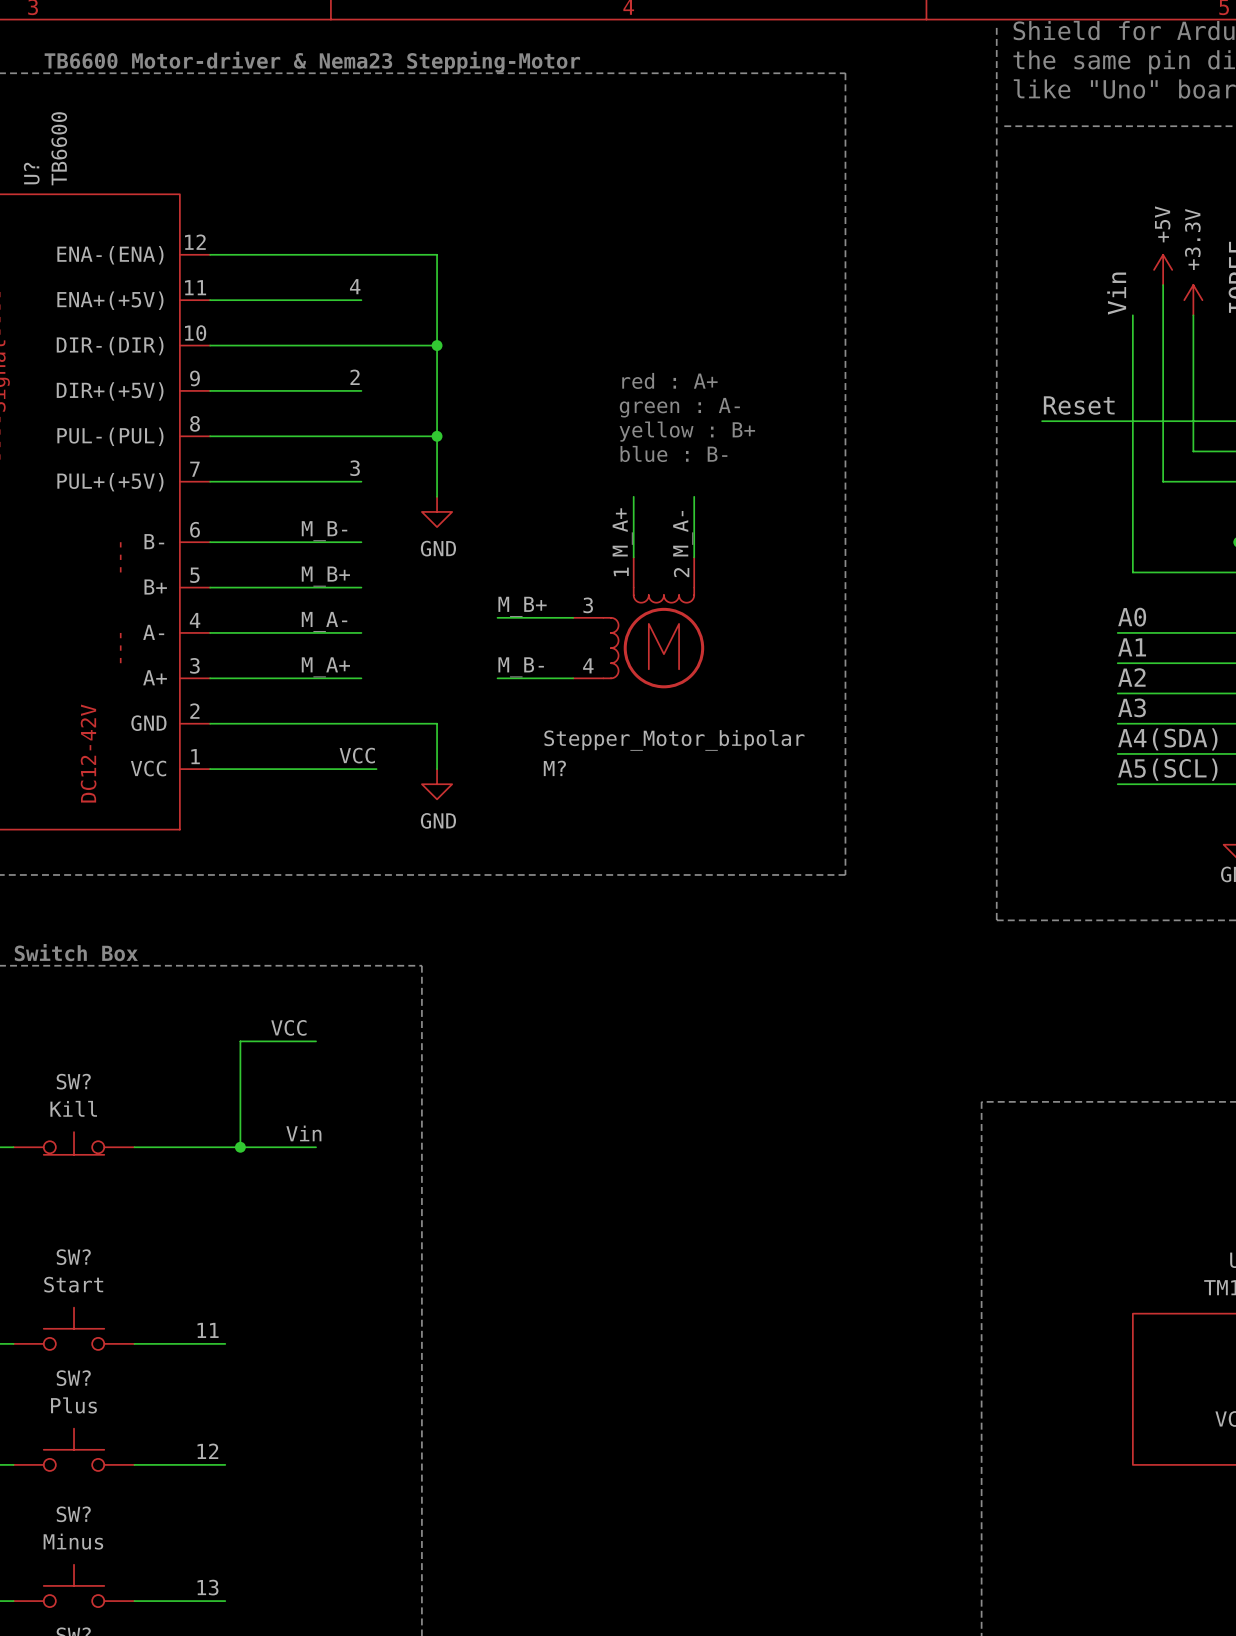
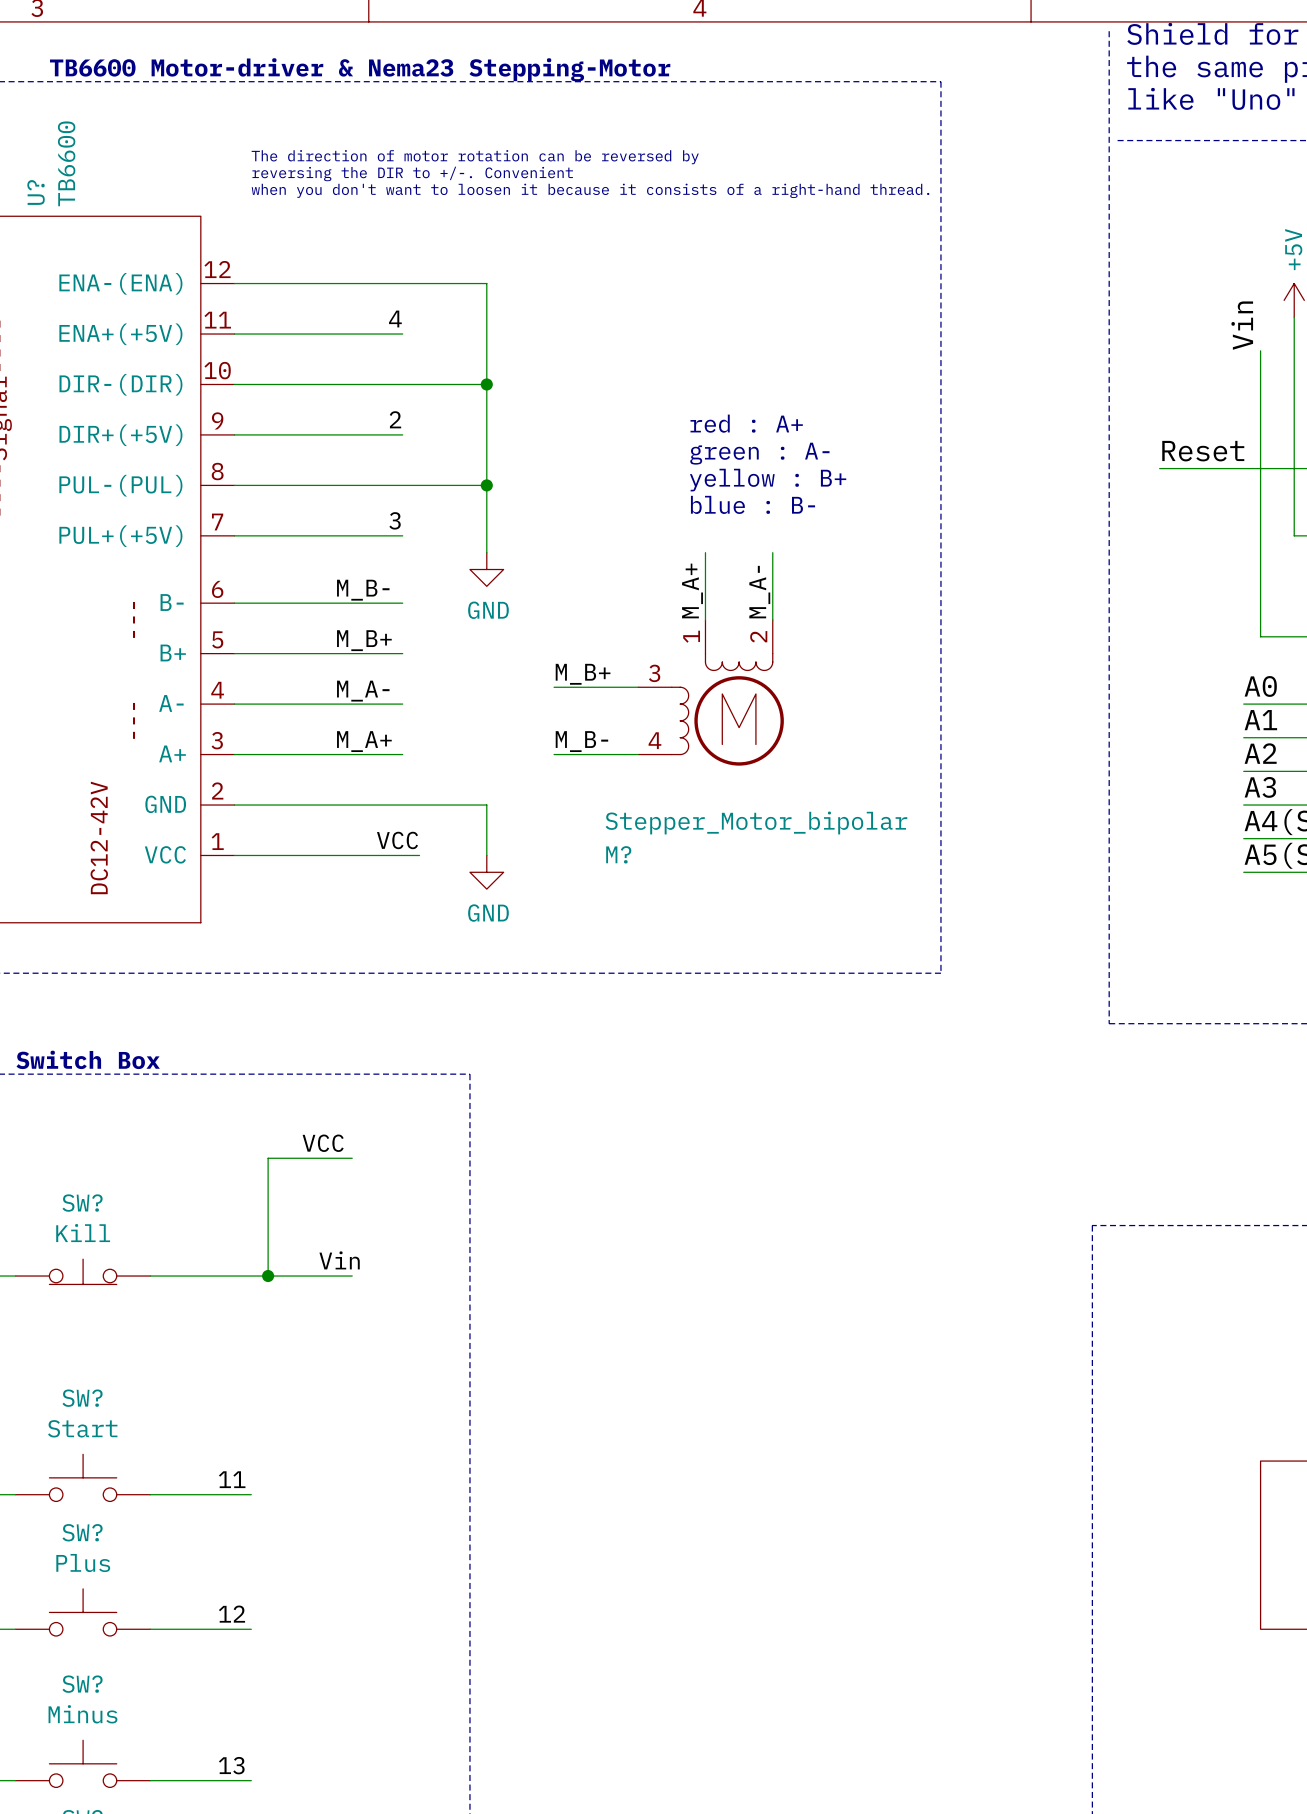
text: none -> The direction of motor rotation can be reversed by (475, 157)
text: none -> reversing the DIR to +/-. Convenient (412, 173)
text: none -> when you don't want to loosen it because it consists of a right-hand thread. (590, 190)

